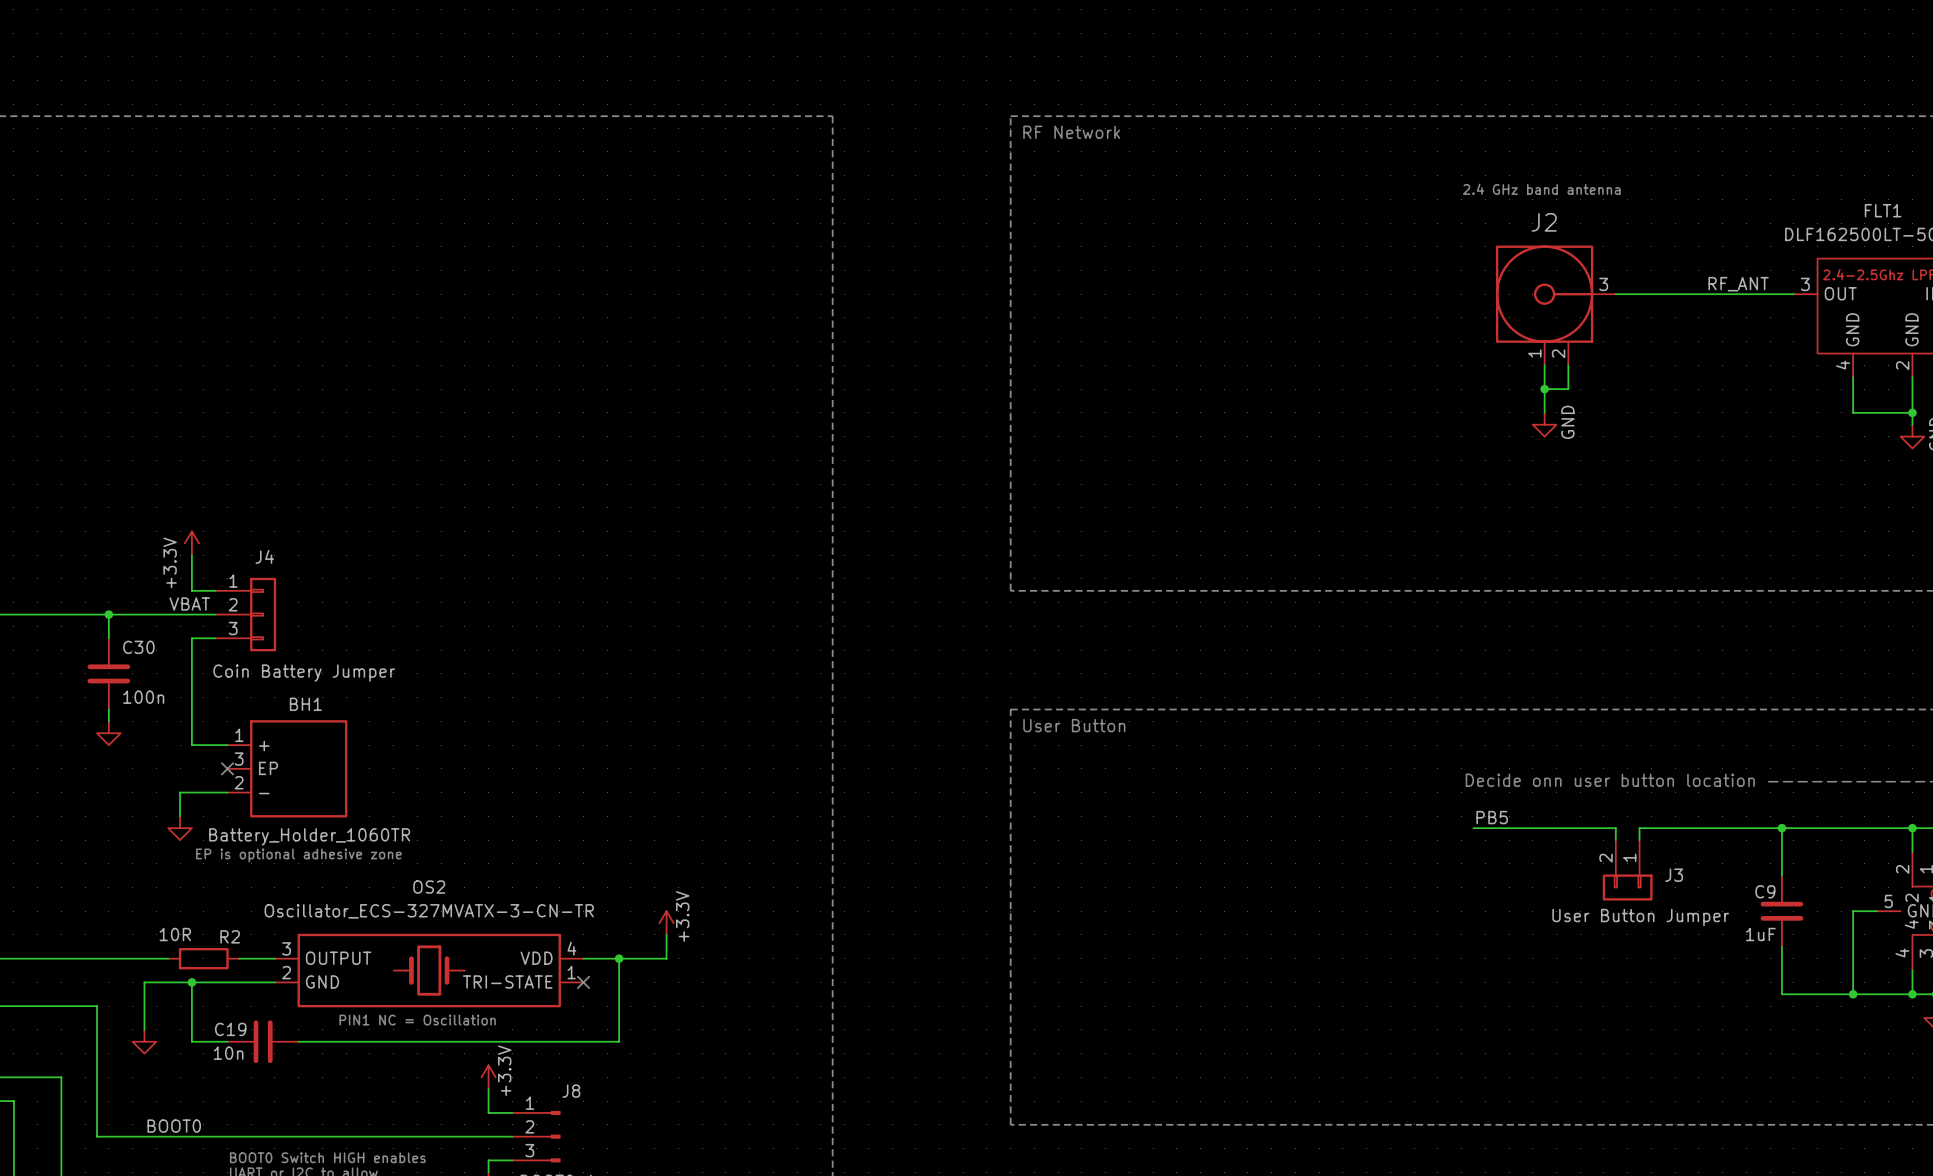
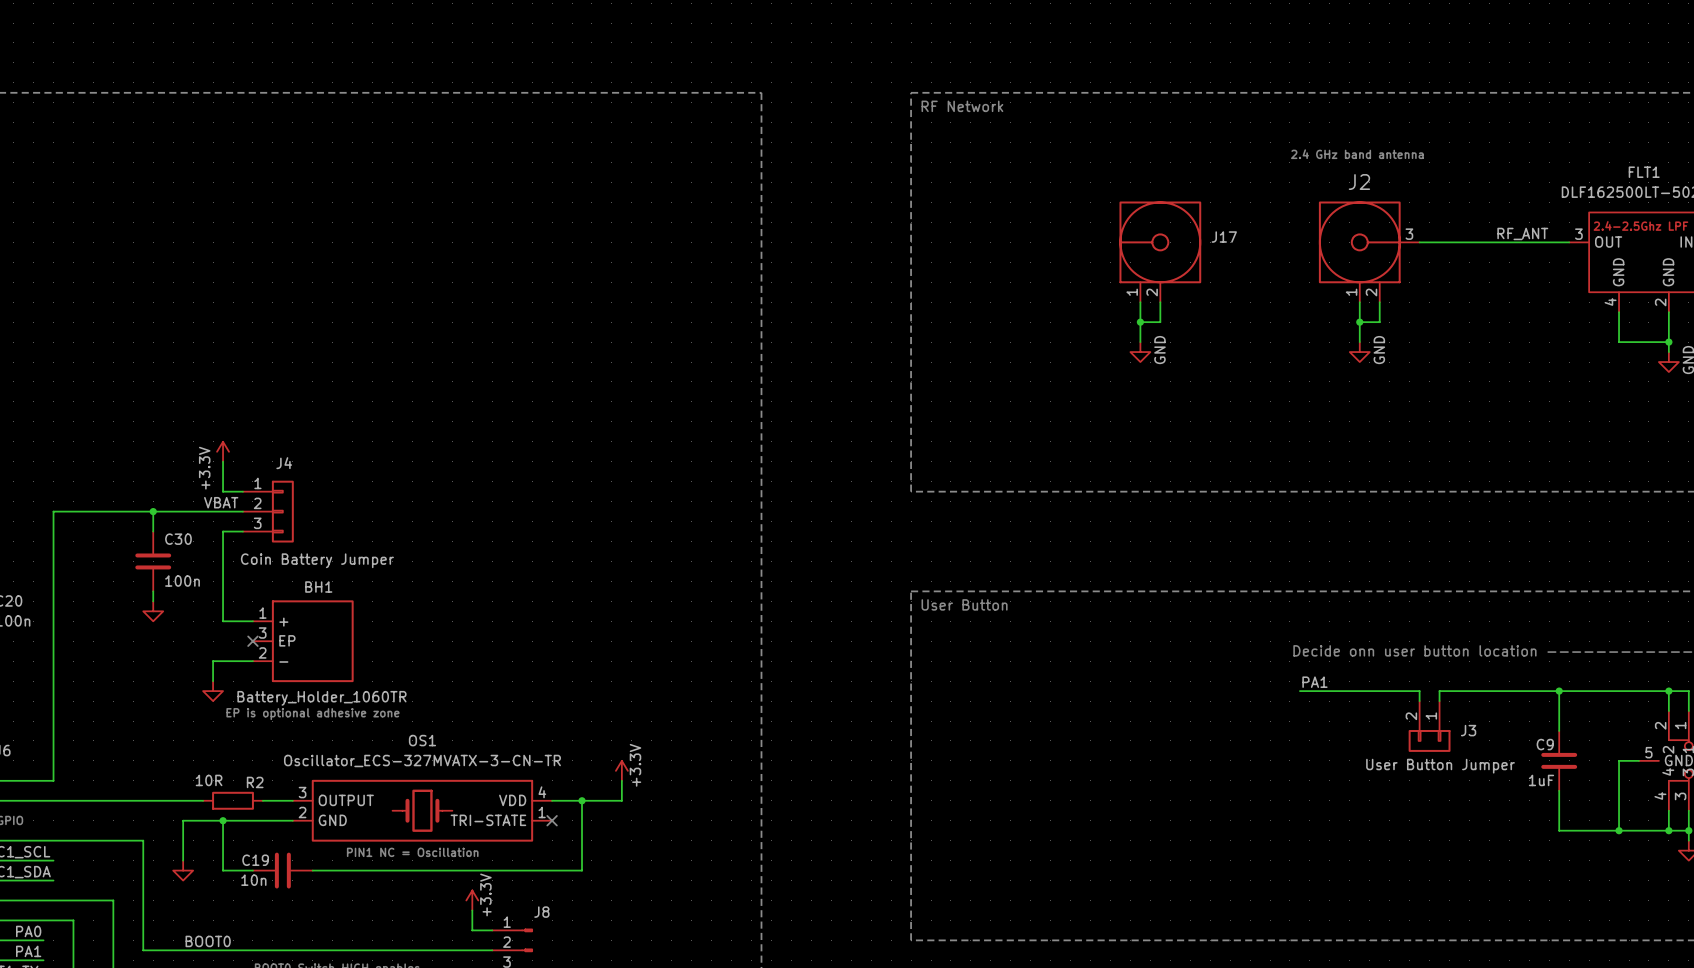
J17: none -> (1160, 251)
wire: none -> (1140, 302) (1140, 342)
wire: none -> (1160, 302) (1160, 322) (1140, 322)
junction: none -> (1140, 322)
power symbol: none -> GND (1140, 352)
label: PB5 (1492, 817) -> PA1 (1314, 682)
OS2 name: OS2 (429, 887) -> OS1 (422, 740)

